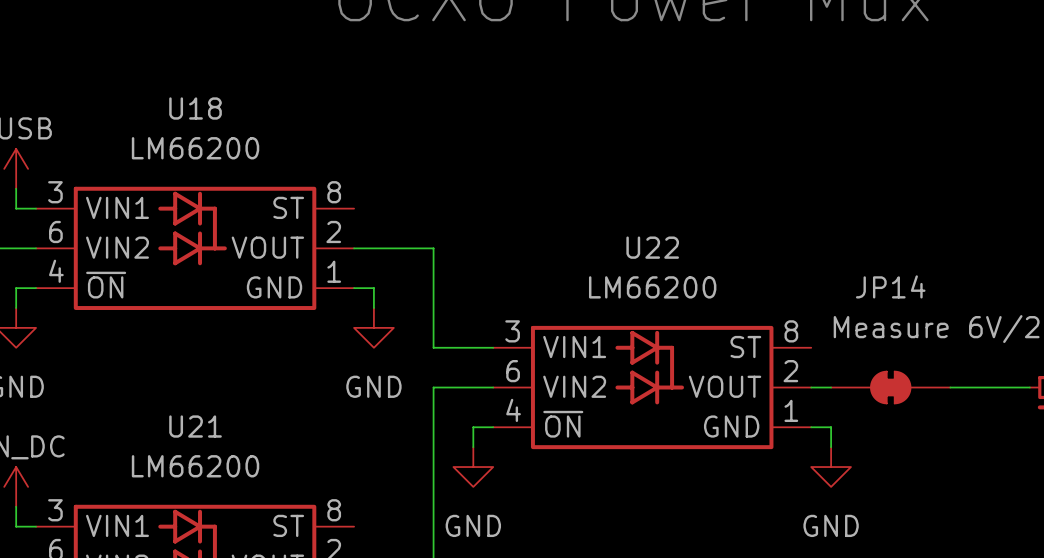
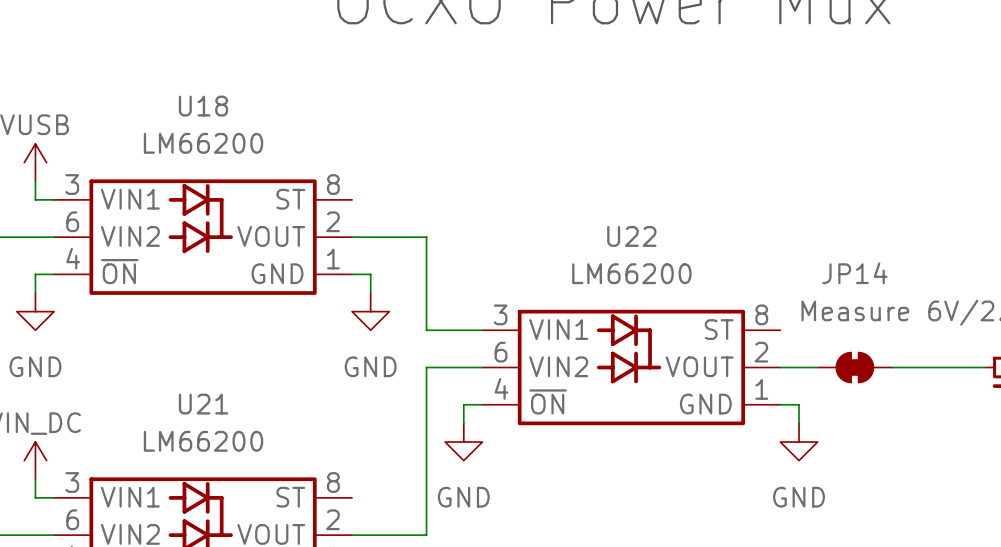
JP14 symbol: [831, 371, 951, 404] -> [817, 352, 893, 383]

